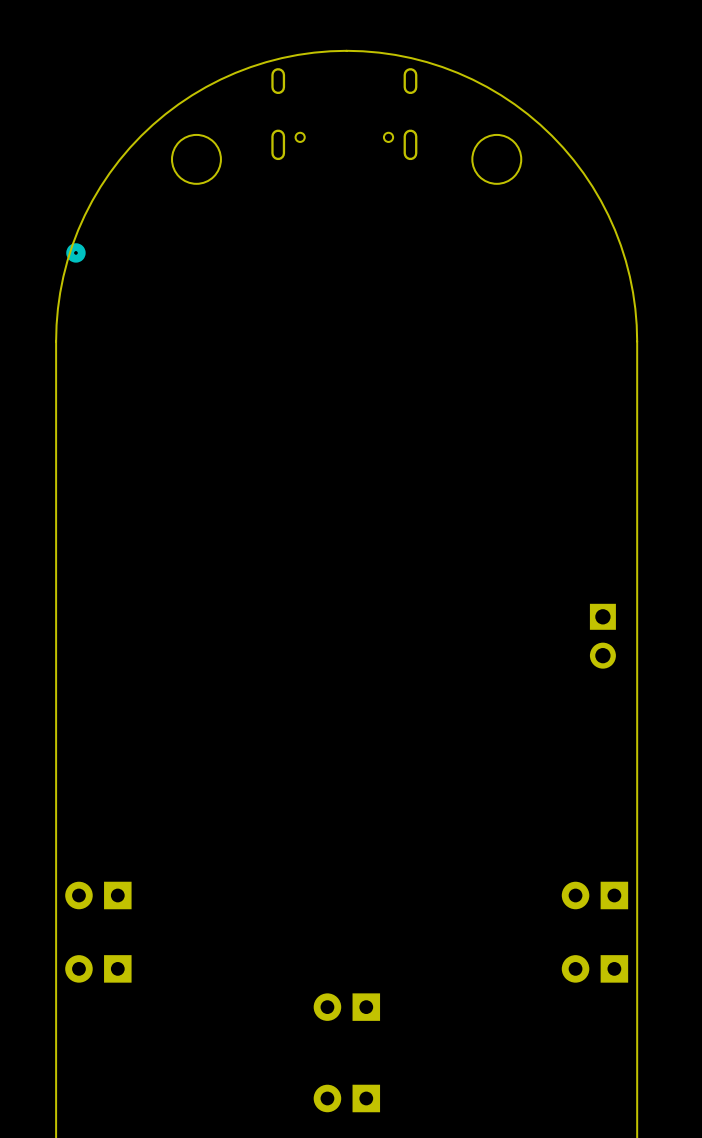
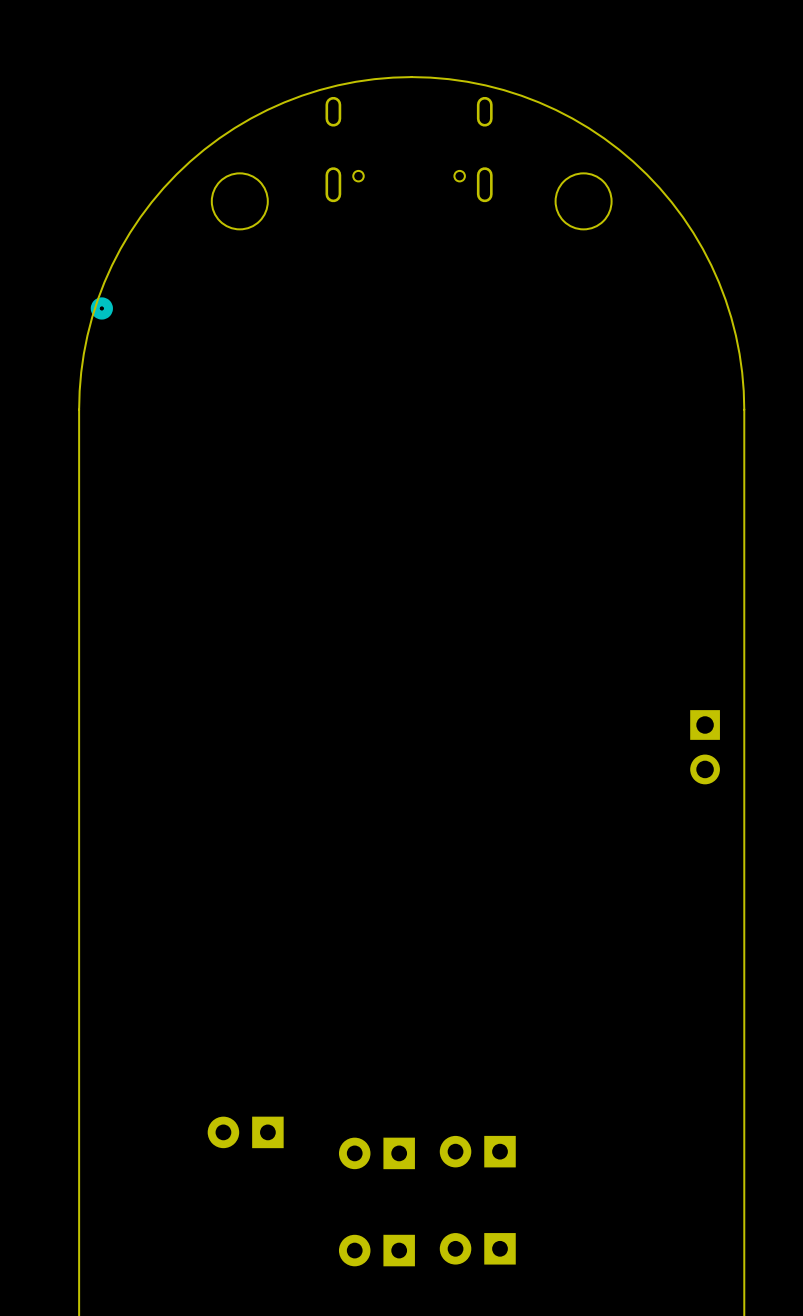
part: (98, 895) -> none
part: (594, 895) -> none
part: (98, 968) -> none
part: (594, 968) -> none
part: none -> (245, 1132)
part: none -> (477, 1151)
part: none -> (376, 1153)
part: (346, 1007) -> none
part: none -> (477, 1248)
part: none -> (376, 1250)
part: (346, 1098) -> none

